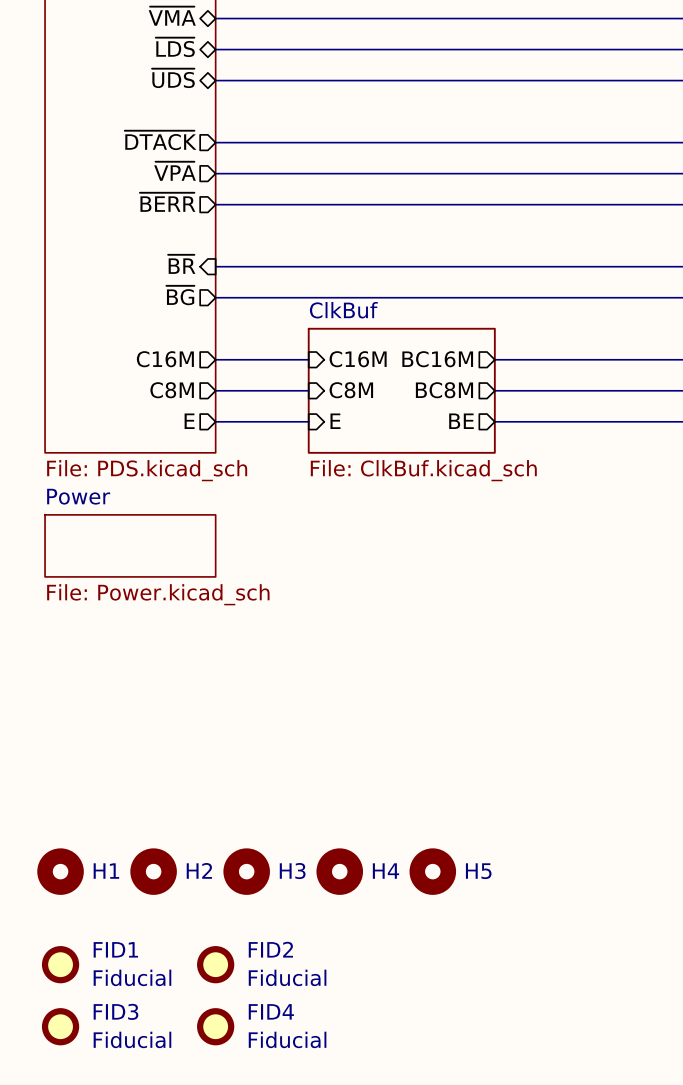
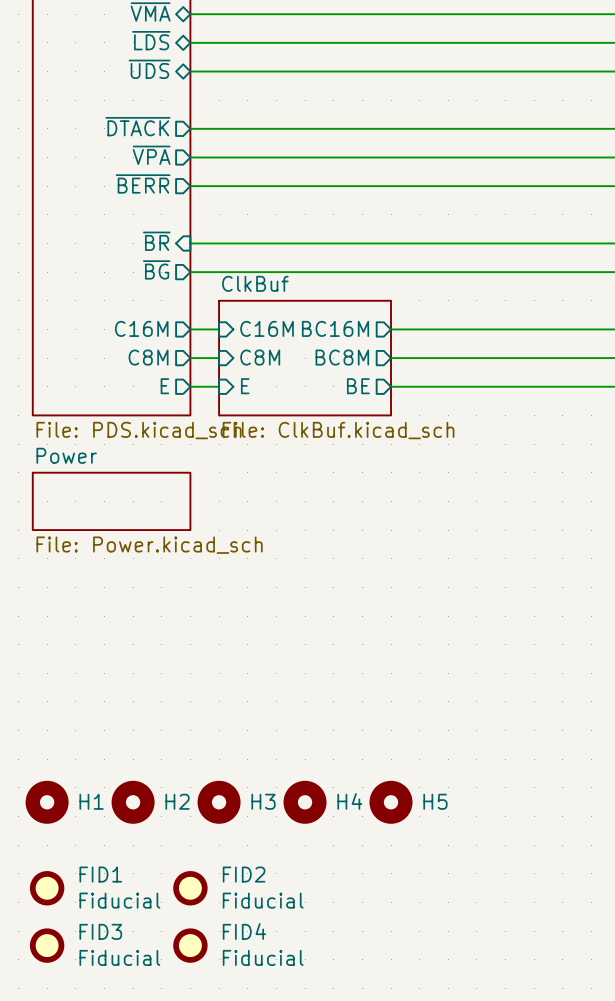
wire: (246, 359) (308, 359) -> (391, 329) (448, 329)
sheet pin position: C16M (358, 359) -> C16M (267, 328)
sheet pin position: BC16M (437, 359) -> BC16M (335, 328)
wire: (246, 390) (308, 390) -> (391, 358) (448, 358)
sheet pin position: C8M (351, 390) -> C8M (260, 357)
sheet ClkBuf position: (401, 390) -> (305, 358)
sheet pin position: BC8M (444, 390) -> BC8M (342, 357)
wire: (246, 421) (308, 421) -> (391, 386) (448, 386)
sheet pin position: E (335, 421) -> E (245, 386)
sheet pin position: BE (461, 421) -> BE (358, 386)

